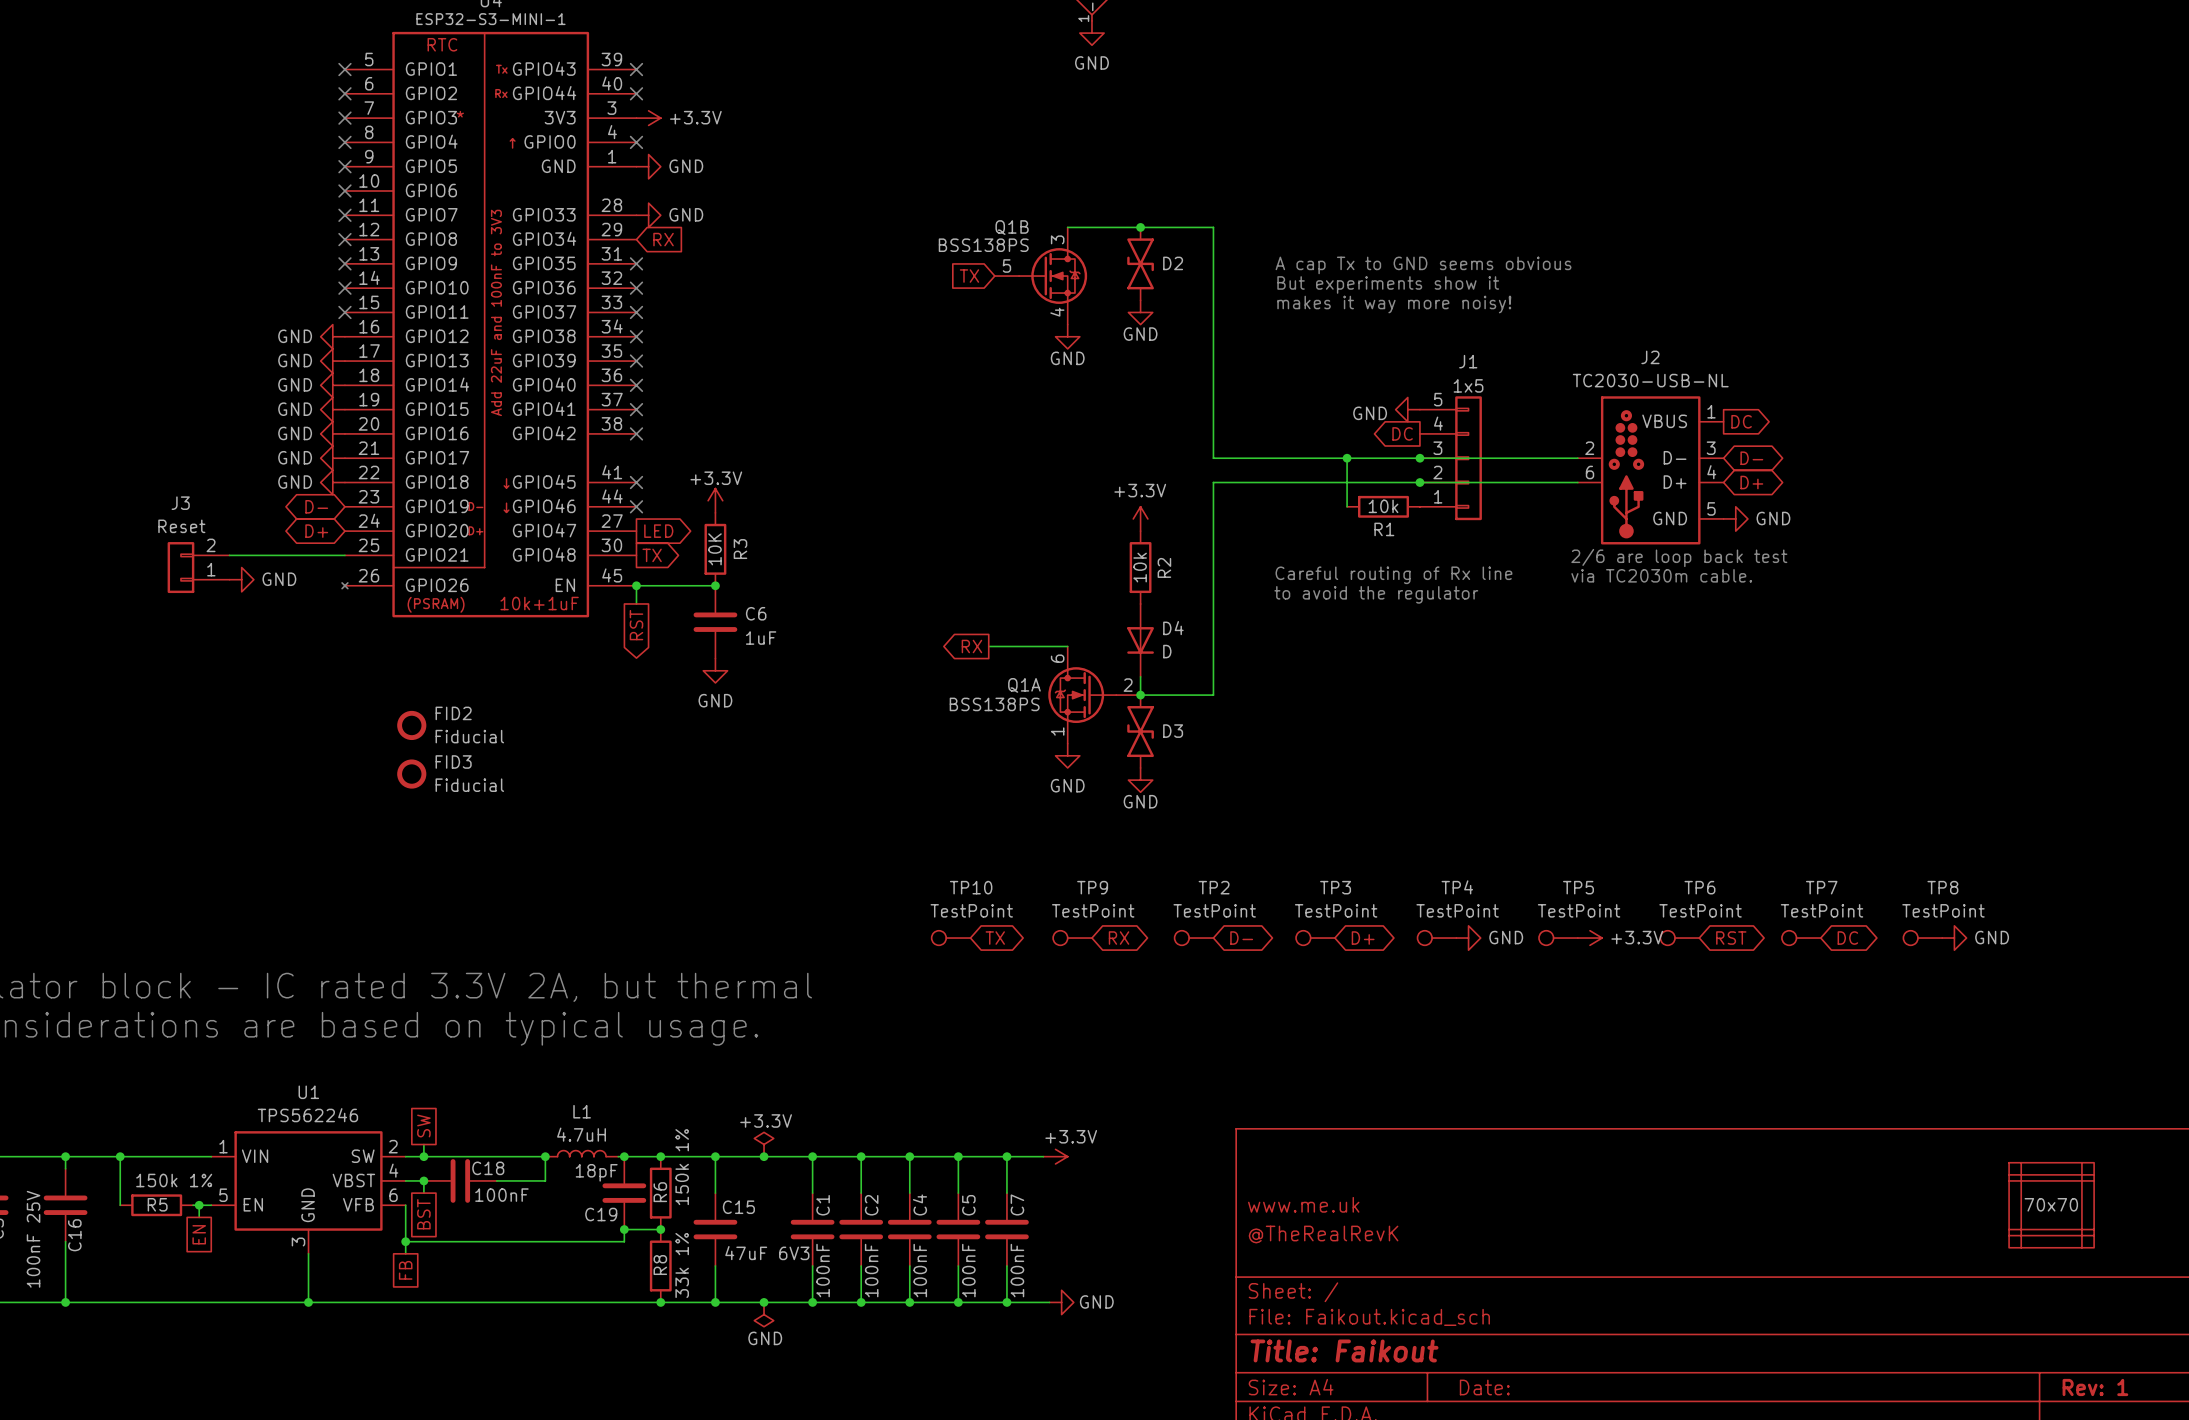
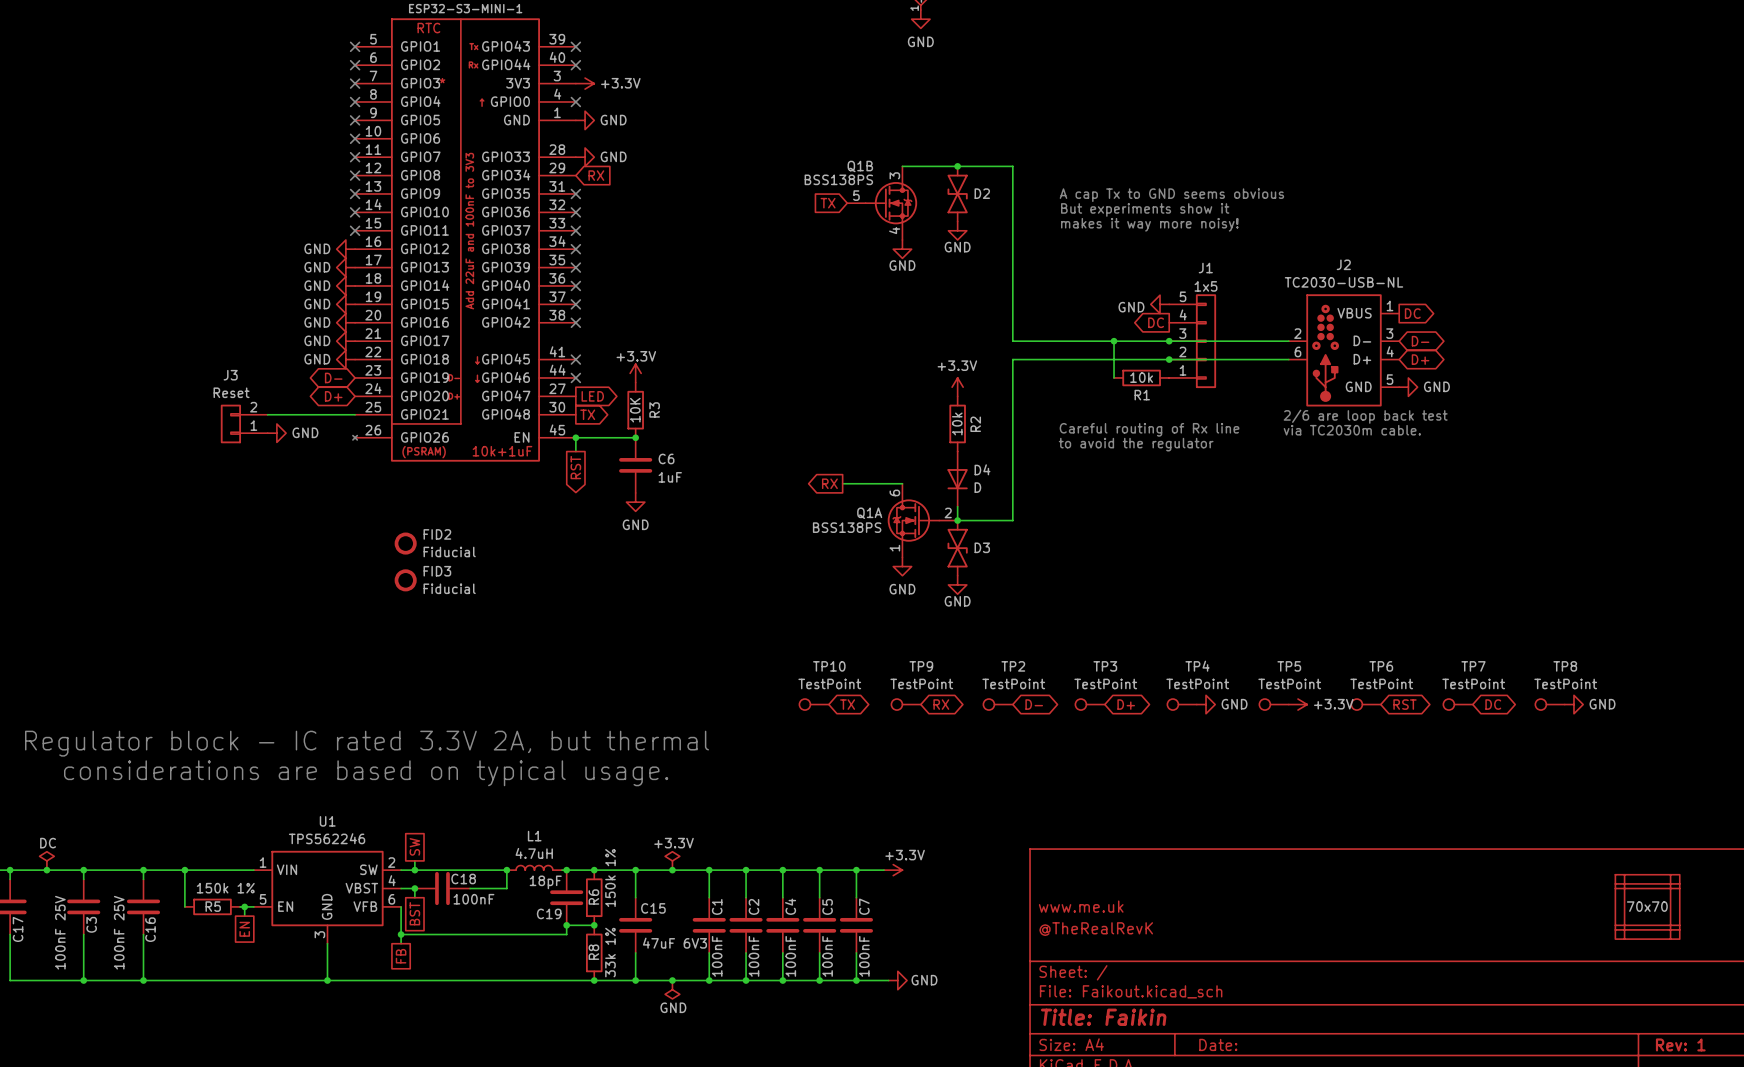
title block: Title: Faikout (1344, 1350) -> Title: Faikin (1103, 1017)

